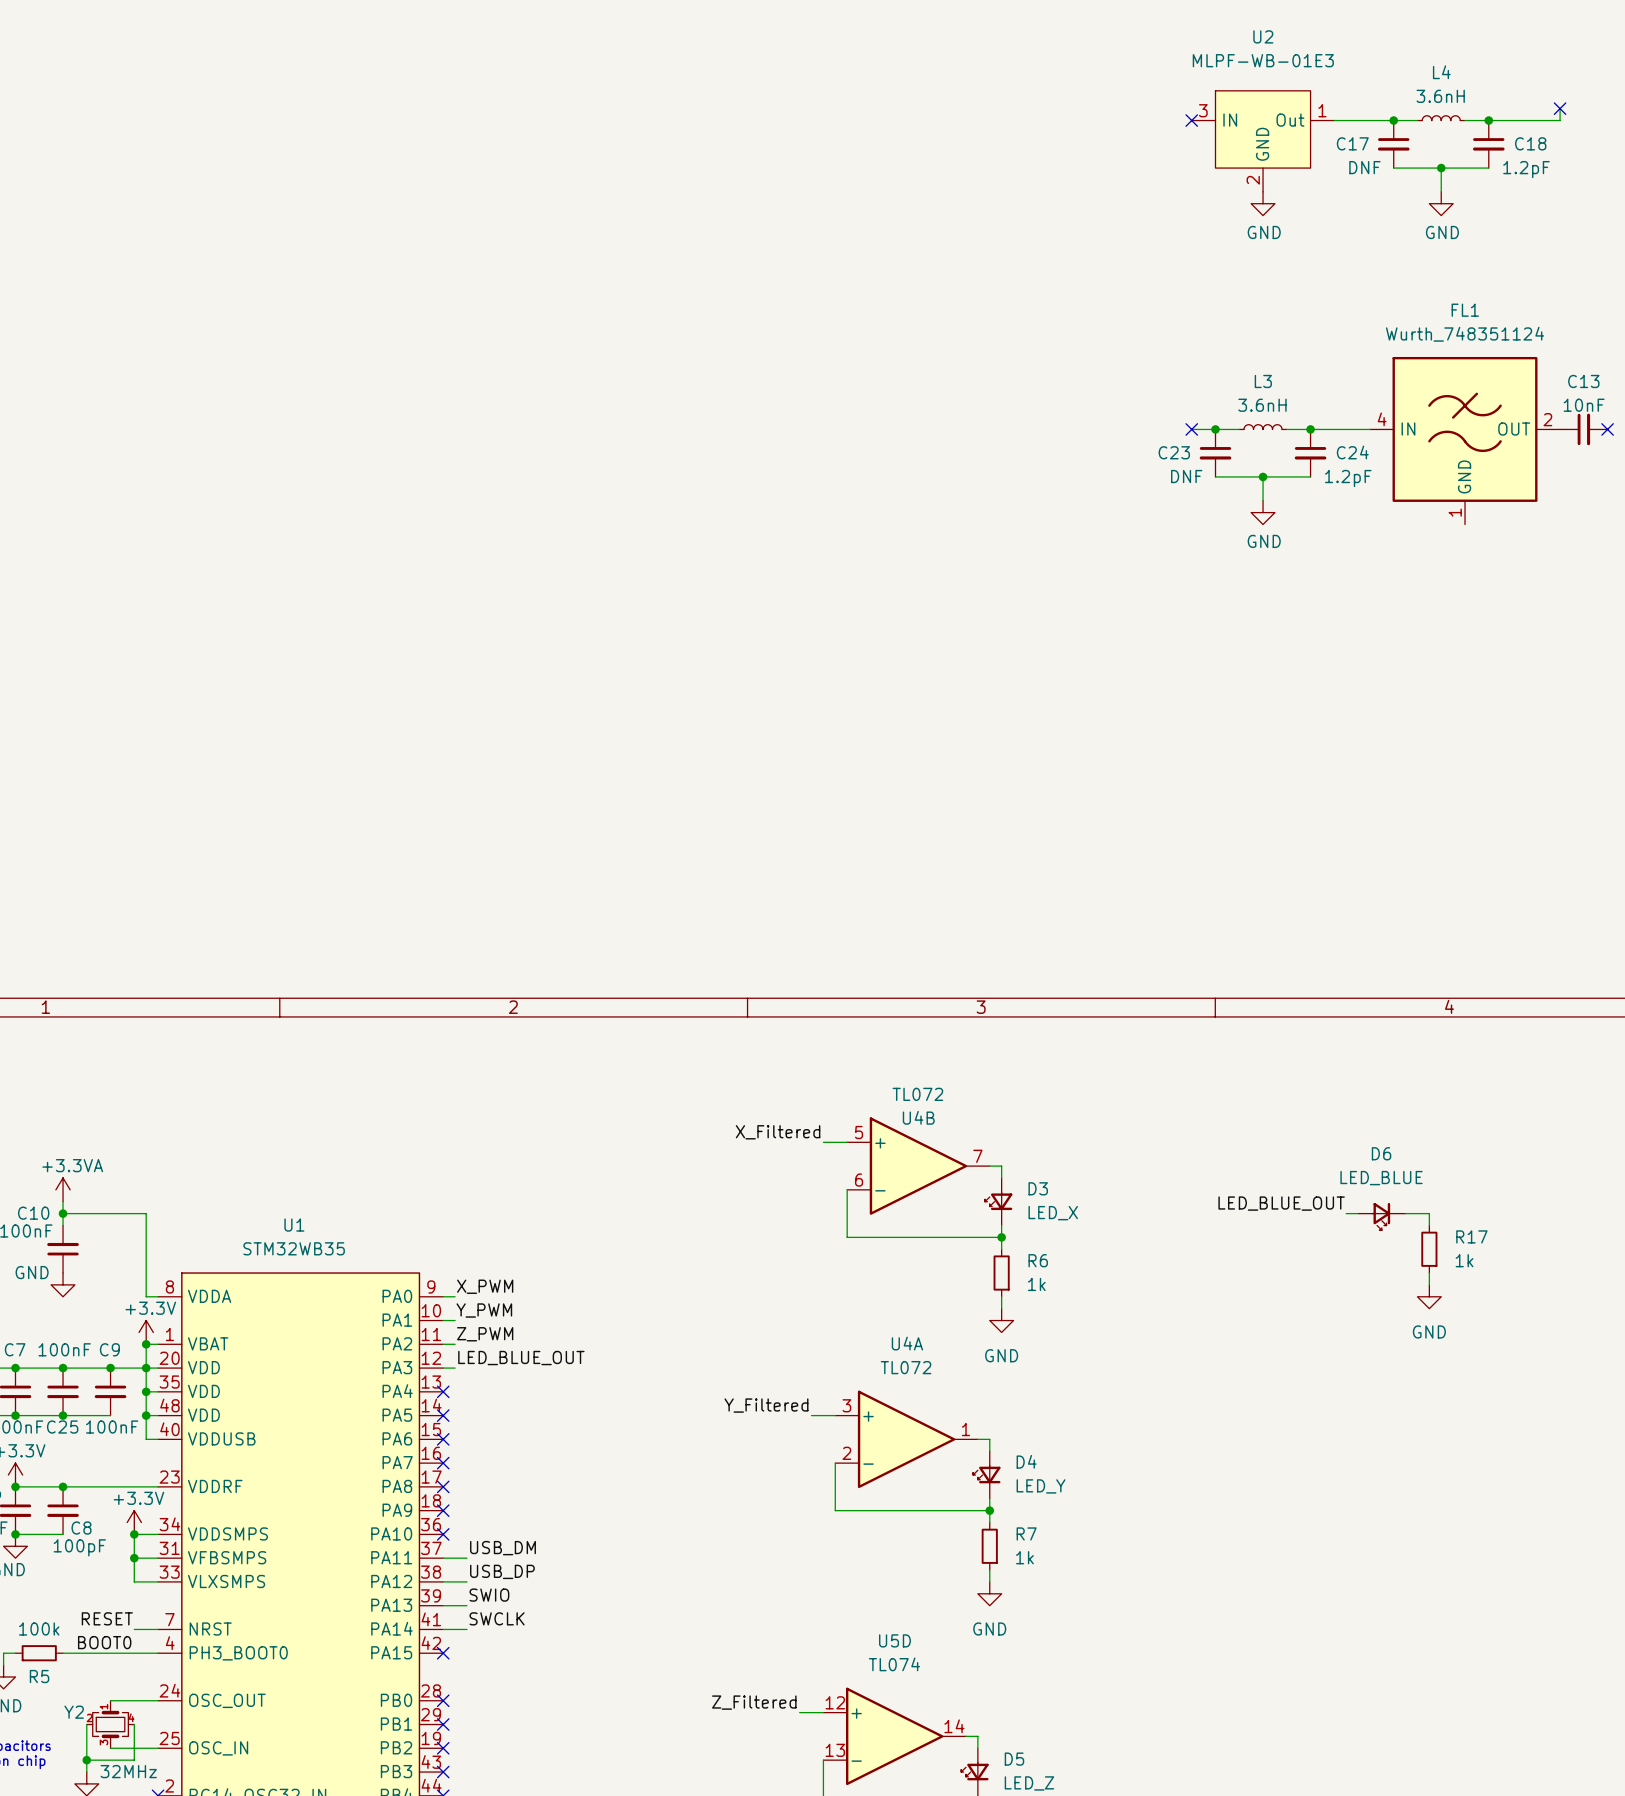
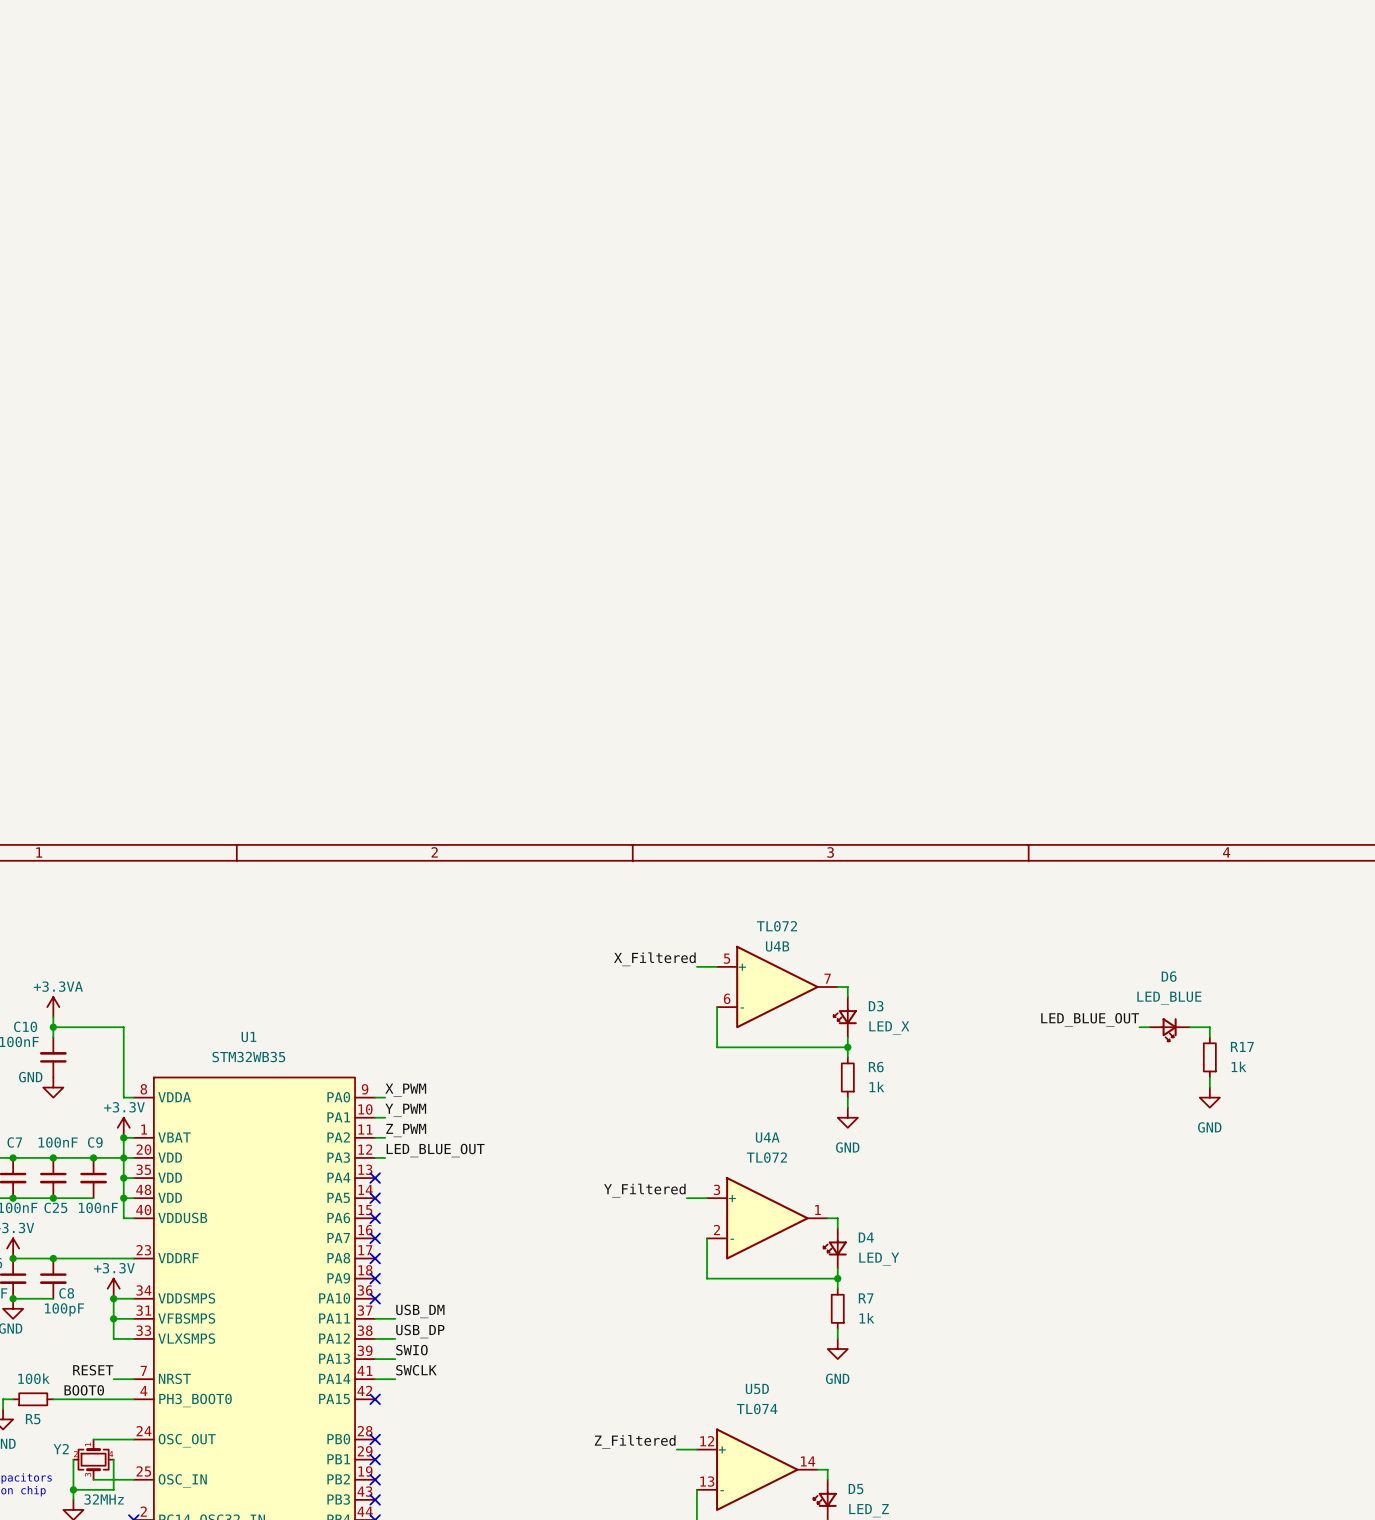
wire: (1560, 108) (1560, 120) (1465, 120) -> none
no-connect mark: (1560, 108) -> none
L4: 3.6nH (1441, 118) -> none
no-connect mark: (1191, 120) -> none
wire: (1334, 120) (1417, 120) -> none
junction: (1393, 120) -> none
junction: (1488, 120) -> none
U2: MLPF-WB-01E3 (1263, 141) -> none
C17: DNF (1393, 144) -> none
C18: 1.2pF (1488, 144) -> none
wire: (1393, 168) (1488, 168) -> none
wire: (1441, 168) (1441, 191) -> none
junction: (1441, 168) -> none
power symbol: GND (1263, 203) -> none
power symbol: GND (1441, 203) -> none
L3: 3.6nH (1263, 427) -> none
wire: (1191, 429) (1239, 429) -> none
no-connect mark: (1191, 429) -> none
junction: (1215, 429) -> none
wire: (1286, 429) (1369, 429) -> none
junction: (1310, 429) -> none
C13: 10nF (1583, 429) -> none
no-connect mark: (1607, 429) -> none
FL1: Wurth_748351124 (1465, 440) -> none
C23: DNF (1215, 453) -> none
C24: 1.2pF (1310, 453) -> none
wire: (1215, 476) (1310, 476) -> none
wire: (1263, 476) (1263, 500) -> none
junction: (1263, 476) -> none
power symbol: GND (1263, 512) -> none

